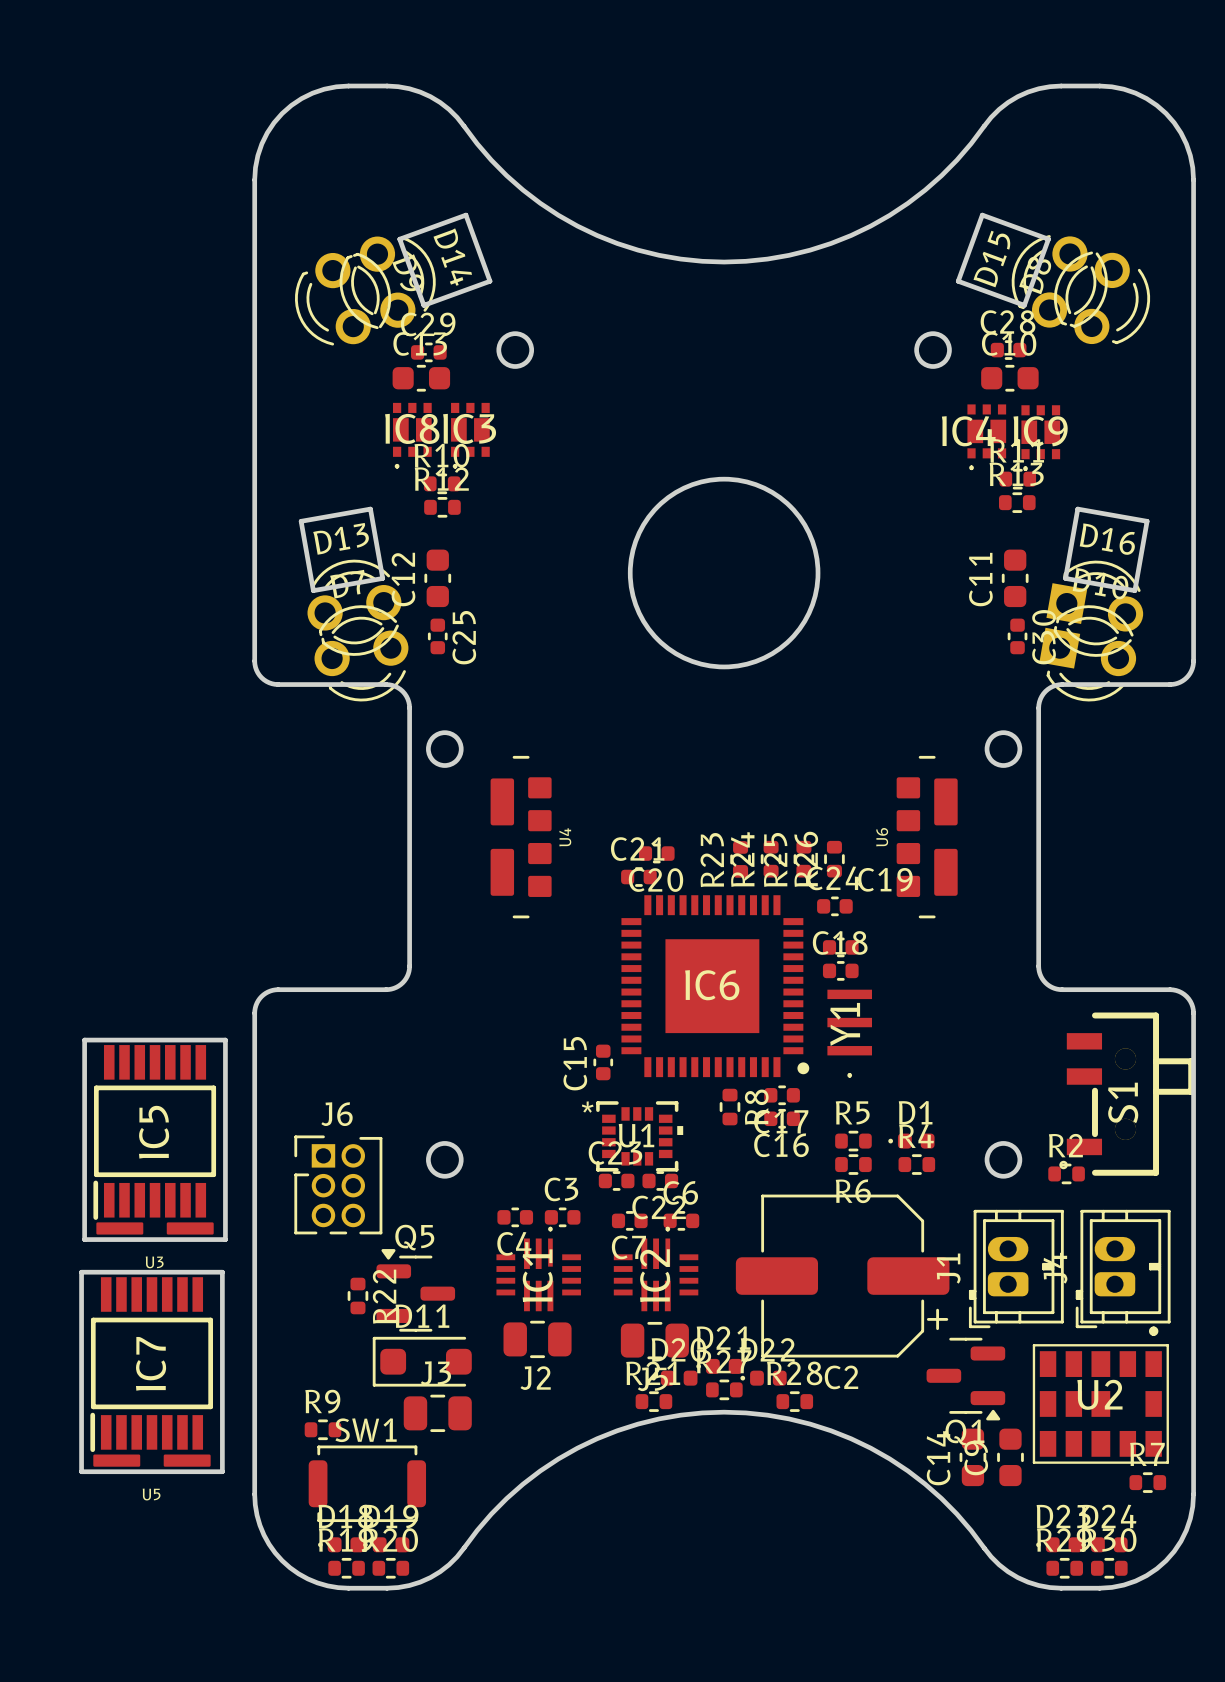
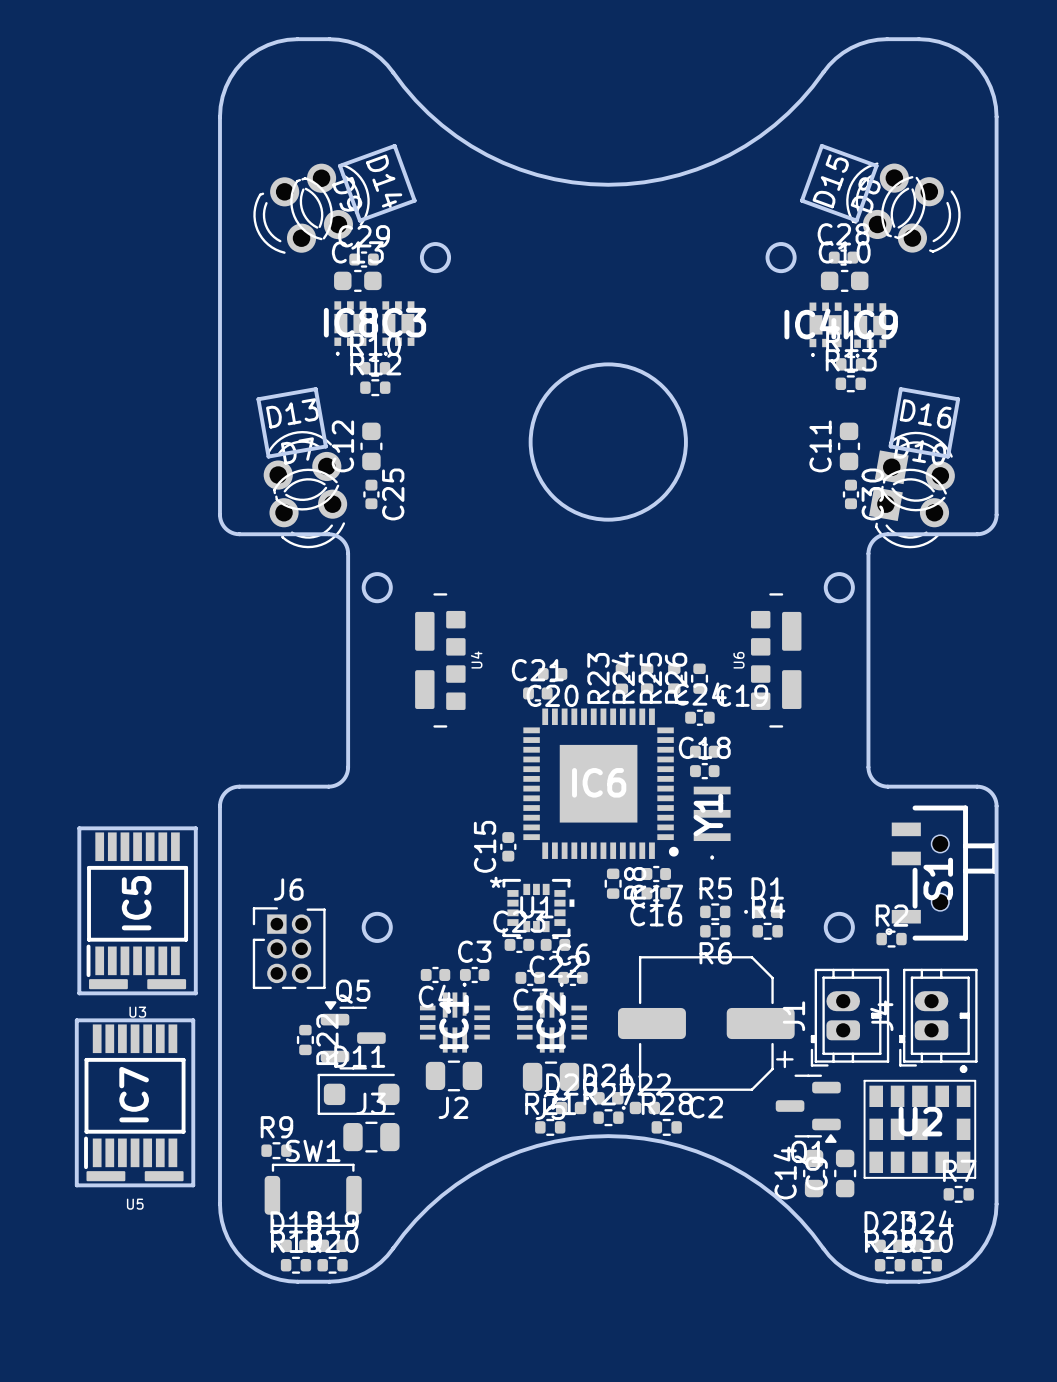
S1 footprint: [1059, 1012, 1195, 1176] -> [885, 805, 998, 941]

